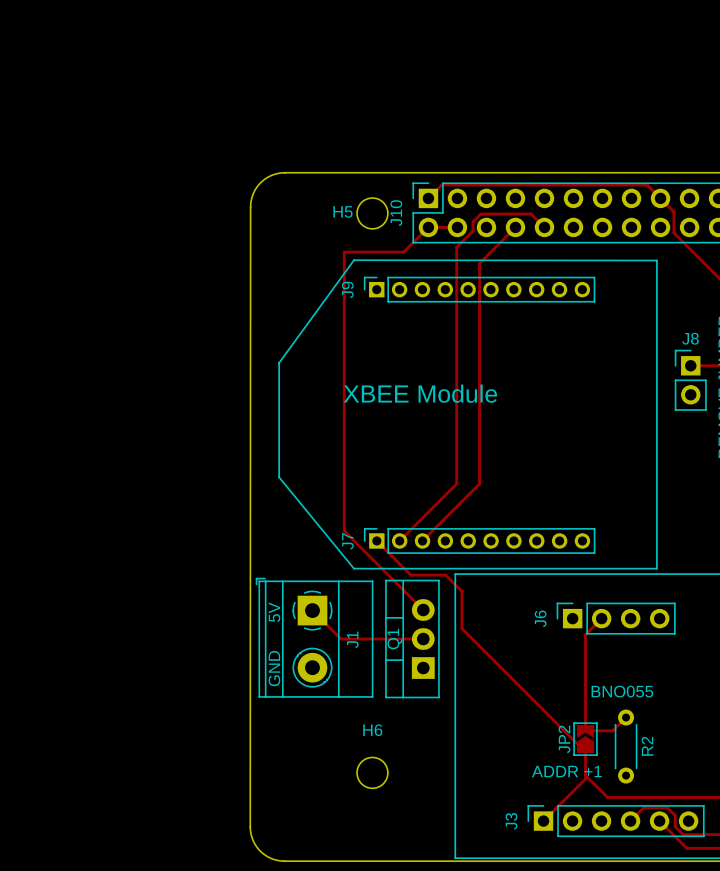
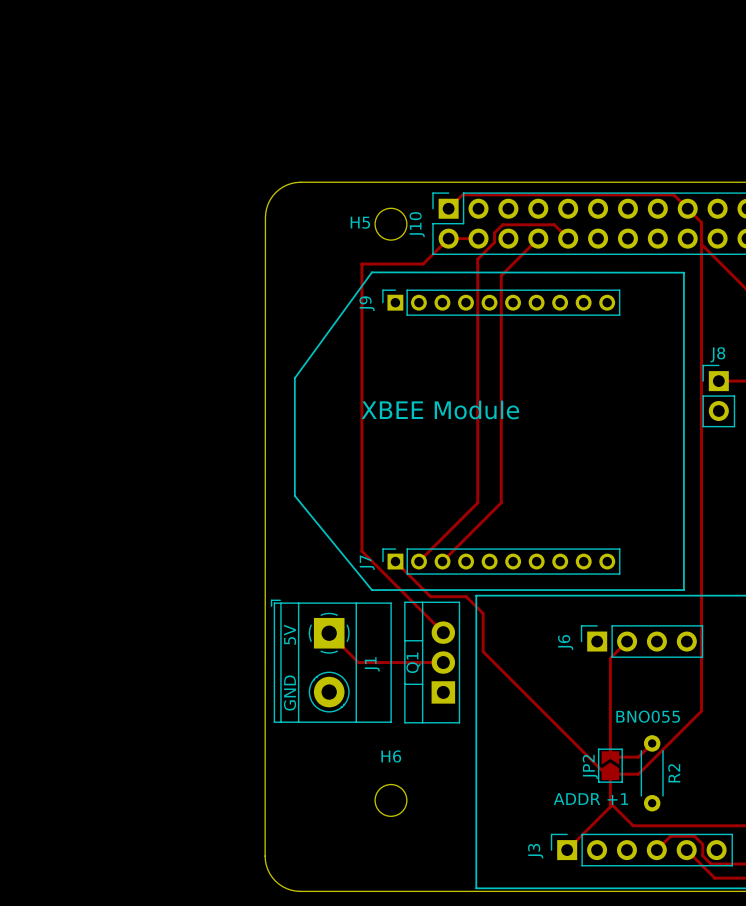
track: none -> (701, 244) (701, 711) (638, 774) (610, 774)

